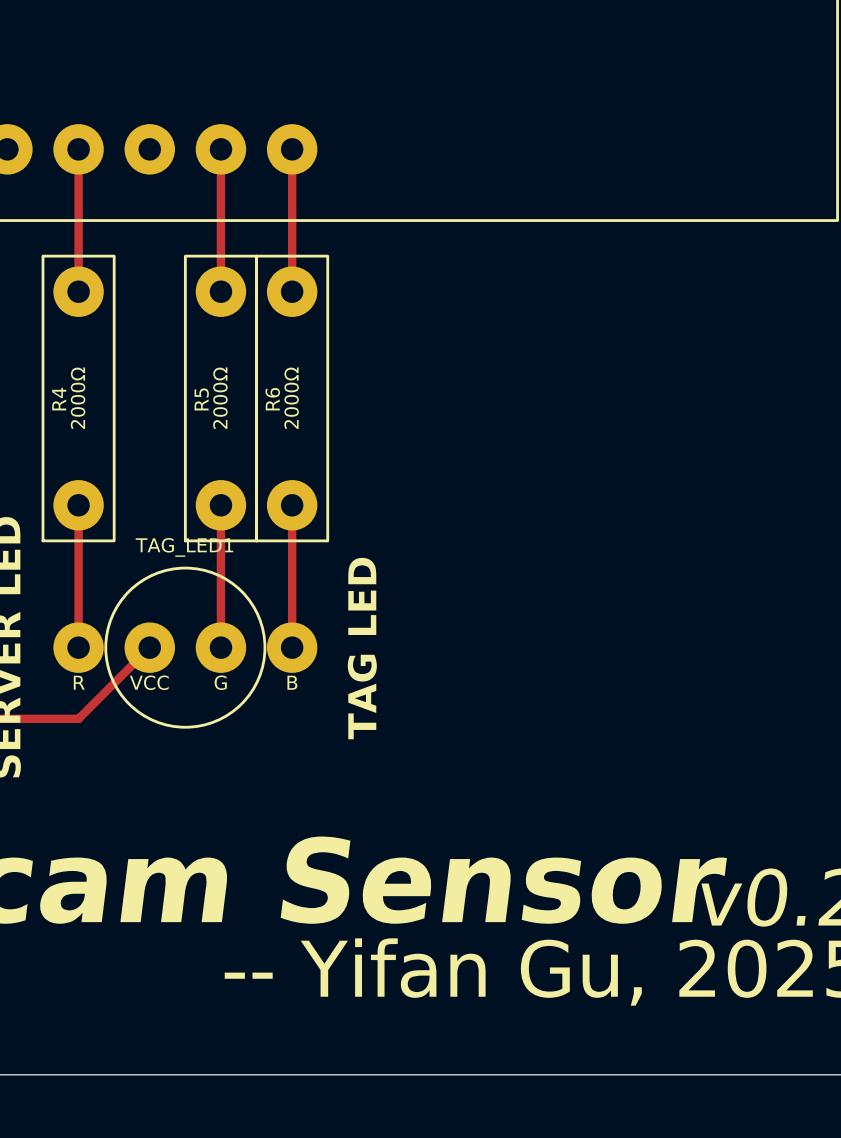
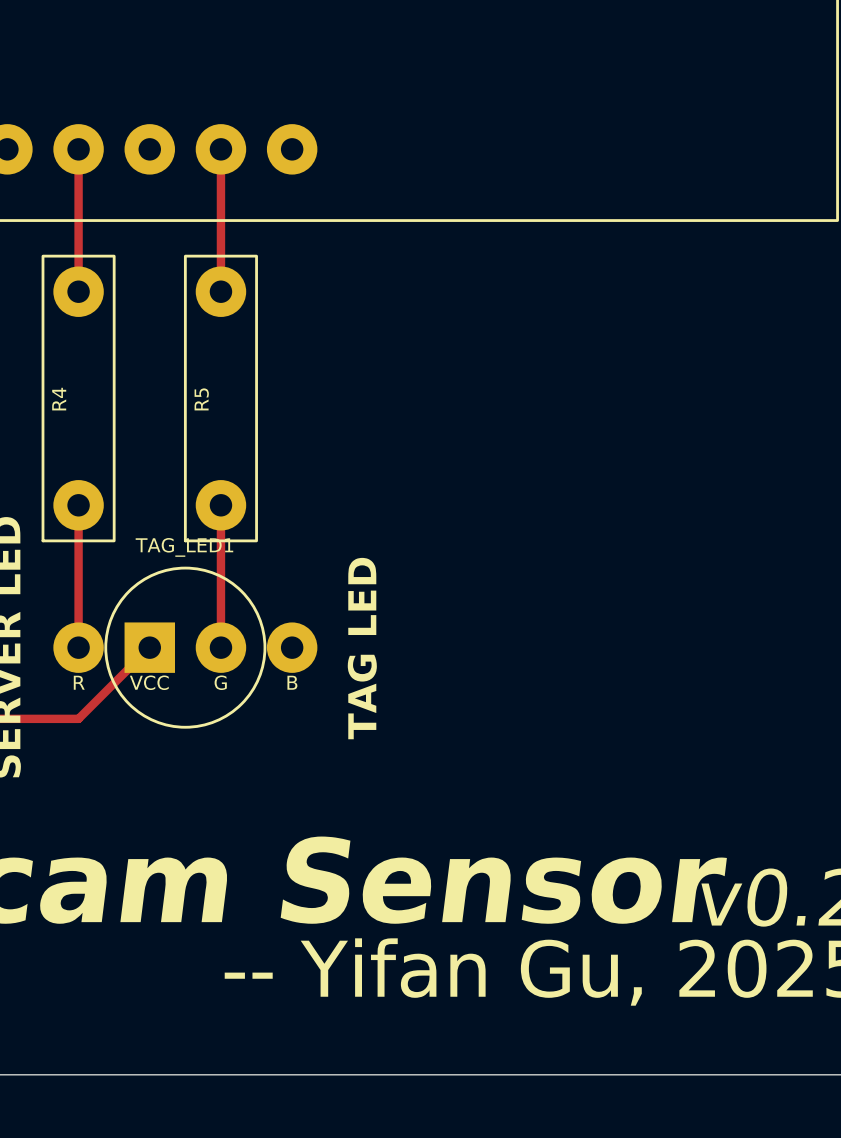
top track: (292, 149) (292, 291) -> none
R4 value: 2000Ω (78, 398) -> none
R5 value: 2000Ω (220, 398) -> none
R6: 2000Ω (292, 398) -> none
top track: (292, 505) (292, 647) -> none
TAG_LED1 footprint: [53, 566, 318, 729] -> [53, 566, 318, 729]

